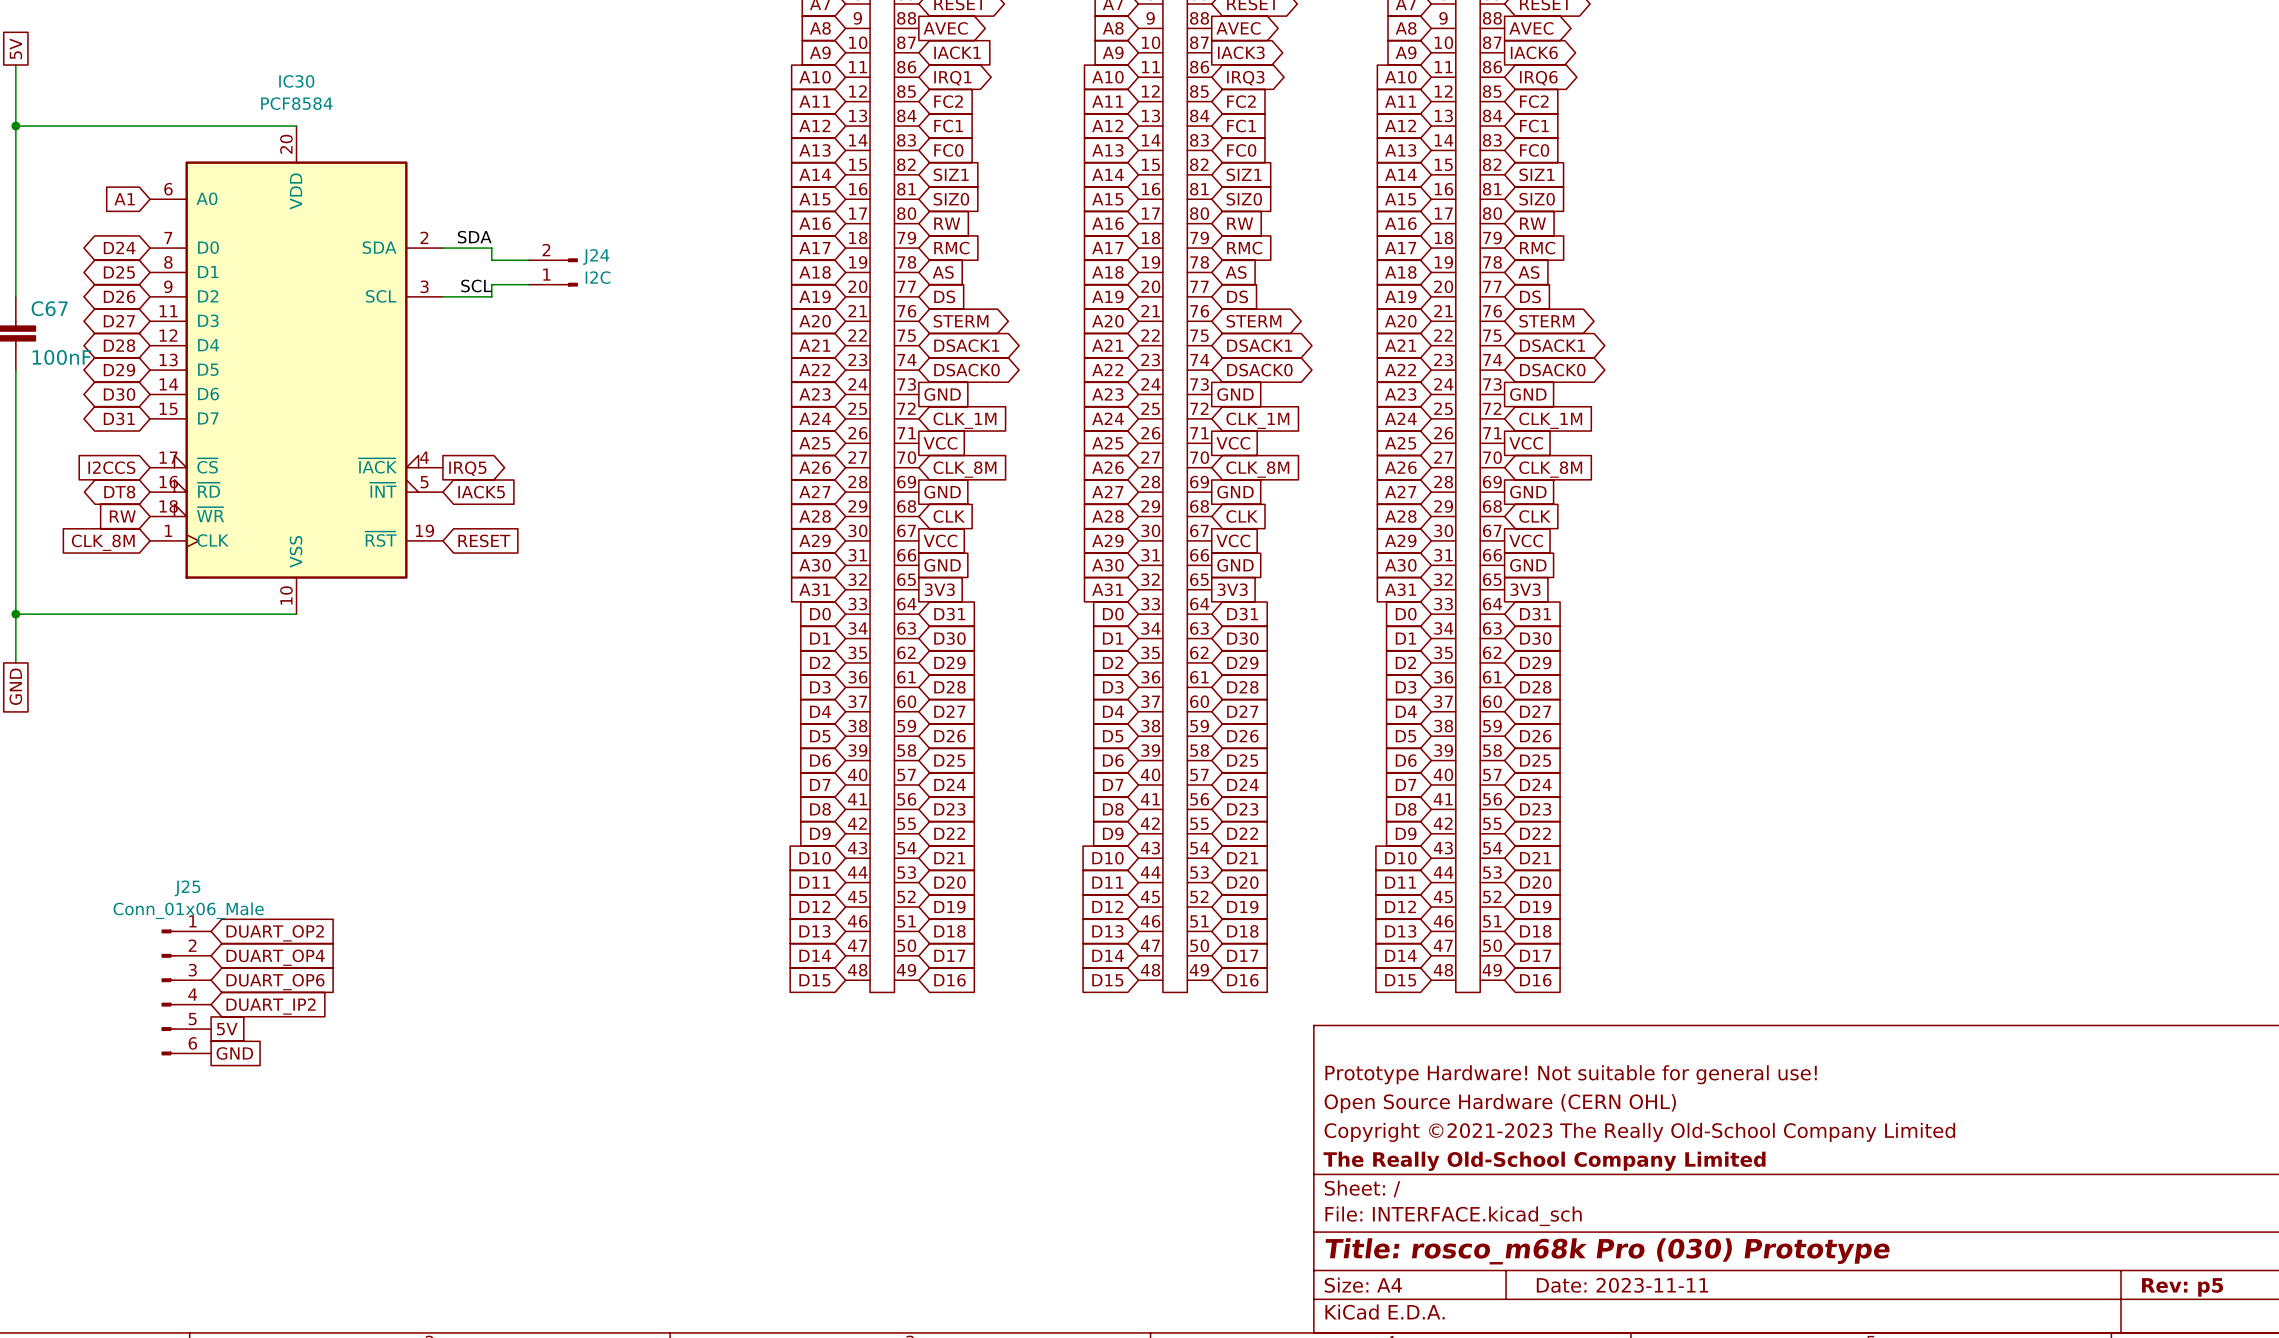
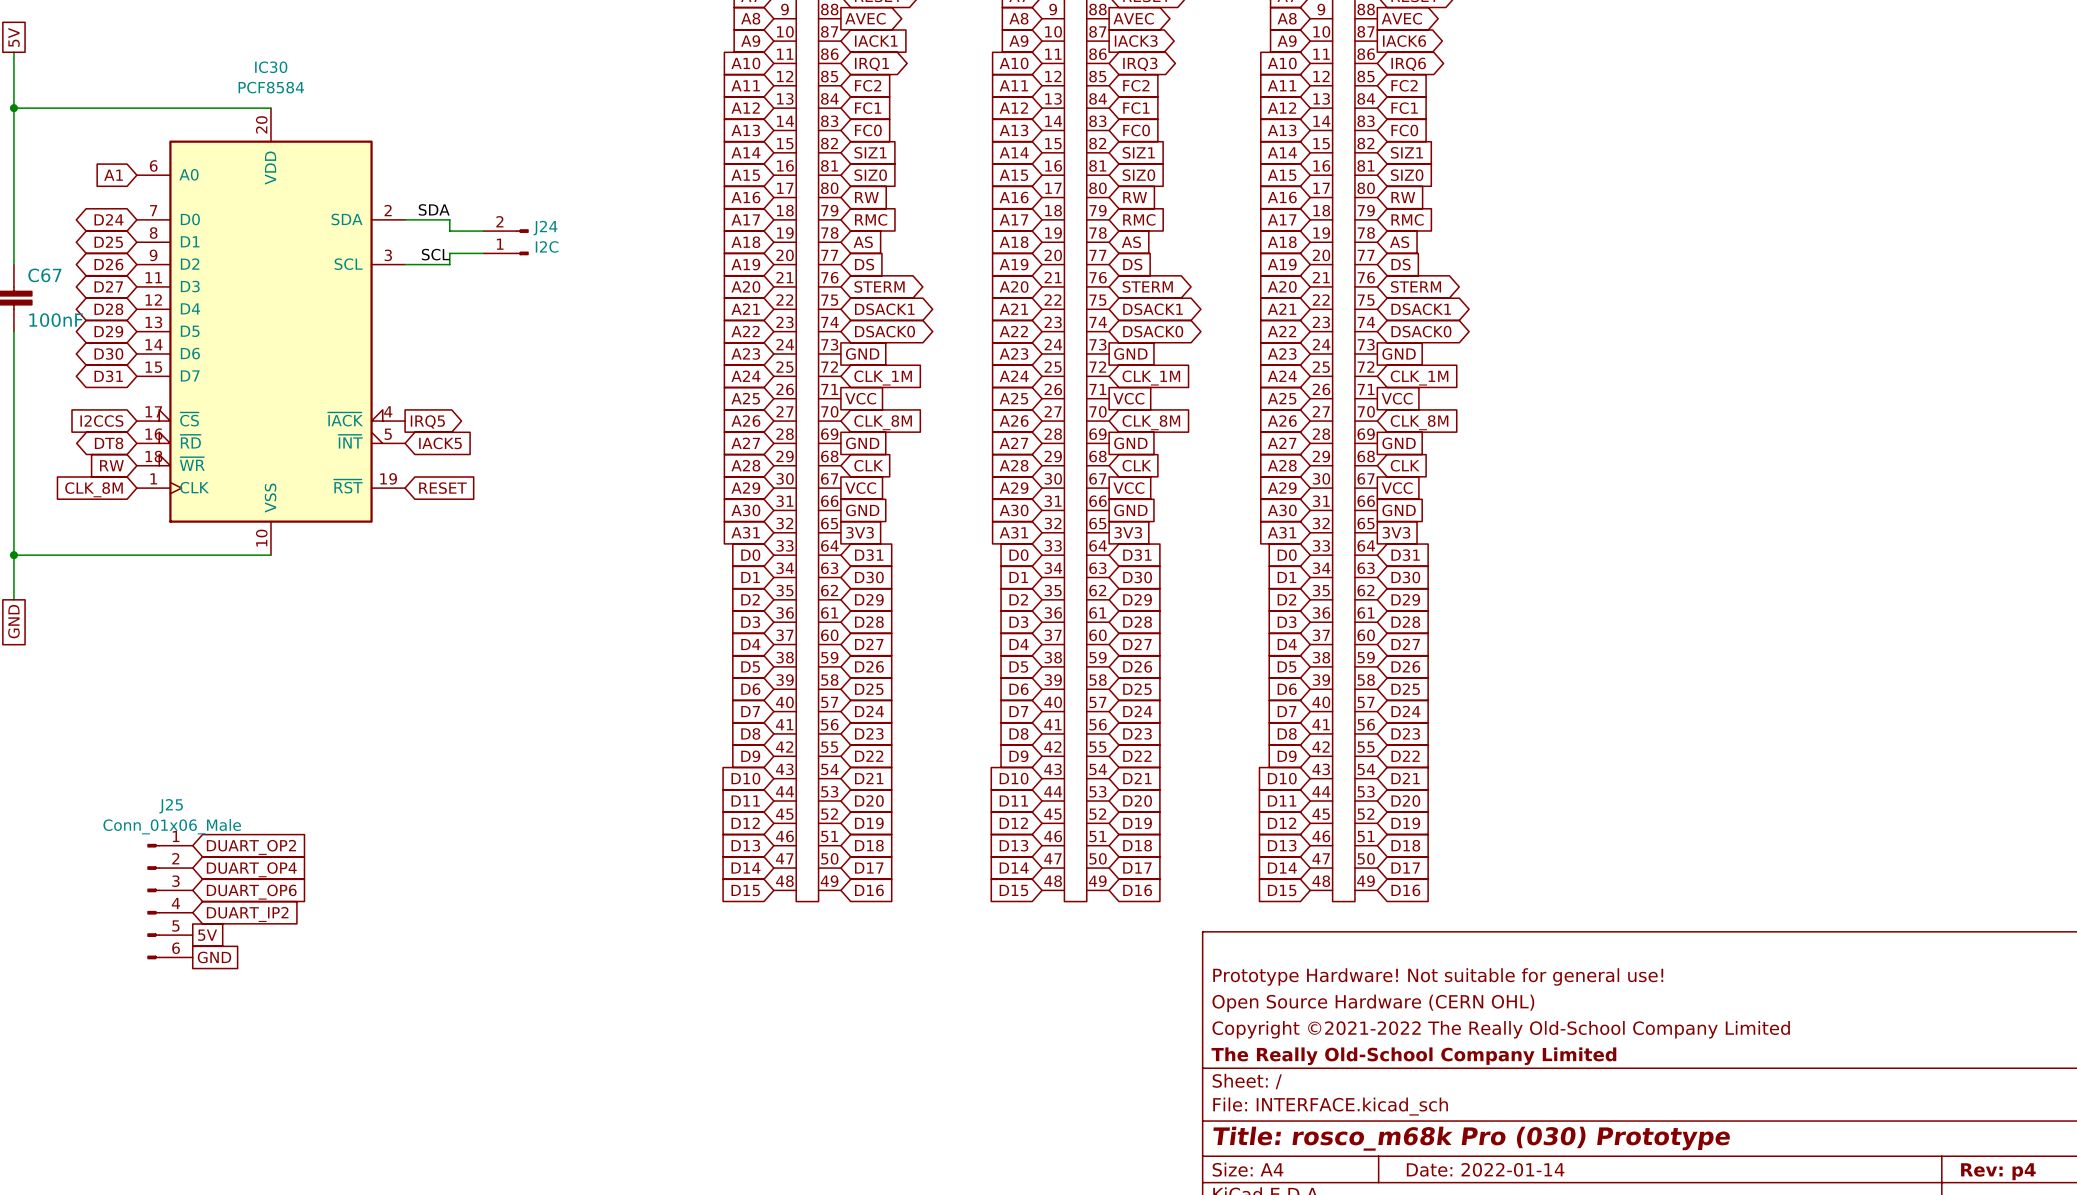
title block: Copyright ©2021-2023 The Really Old-School Company Limited (1639, 1132) -> Copyright ©2021-2022 The Really Old-School Company Limited (1501, 1029)
title block: Date: 2023-11-11 (1622, 1285) -> Date: 2022-01-14 (1485, 1169)
title block: Rev: p5 (2182, 1287) -> Rev: p4 (1998, 1171)

